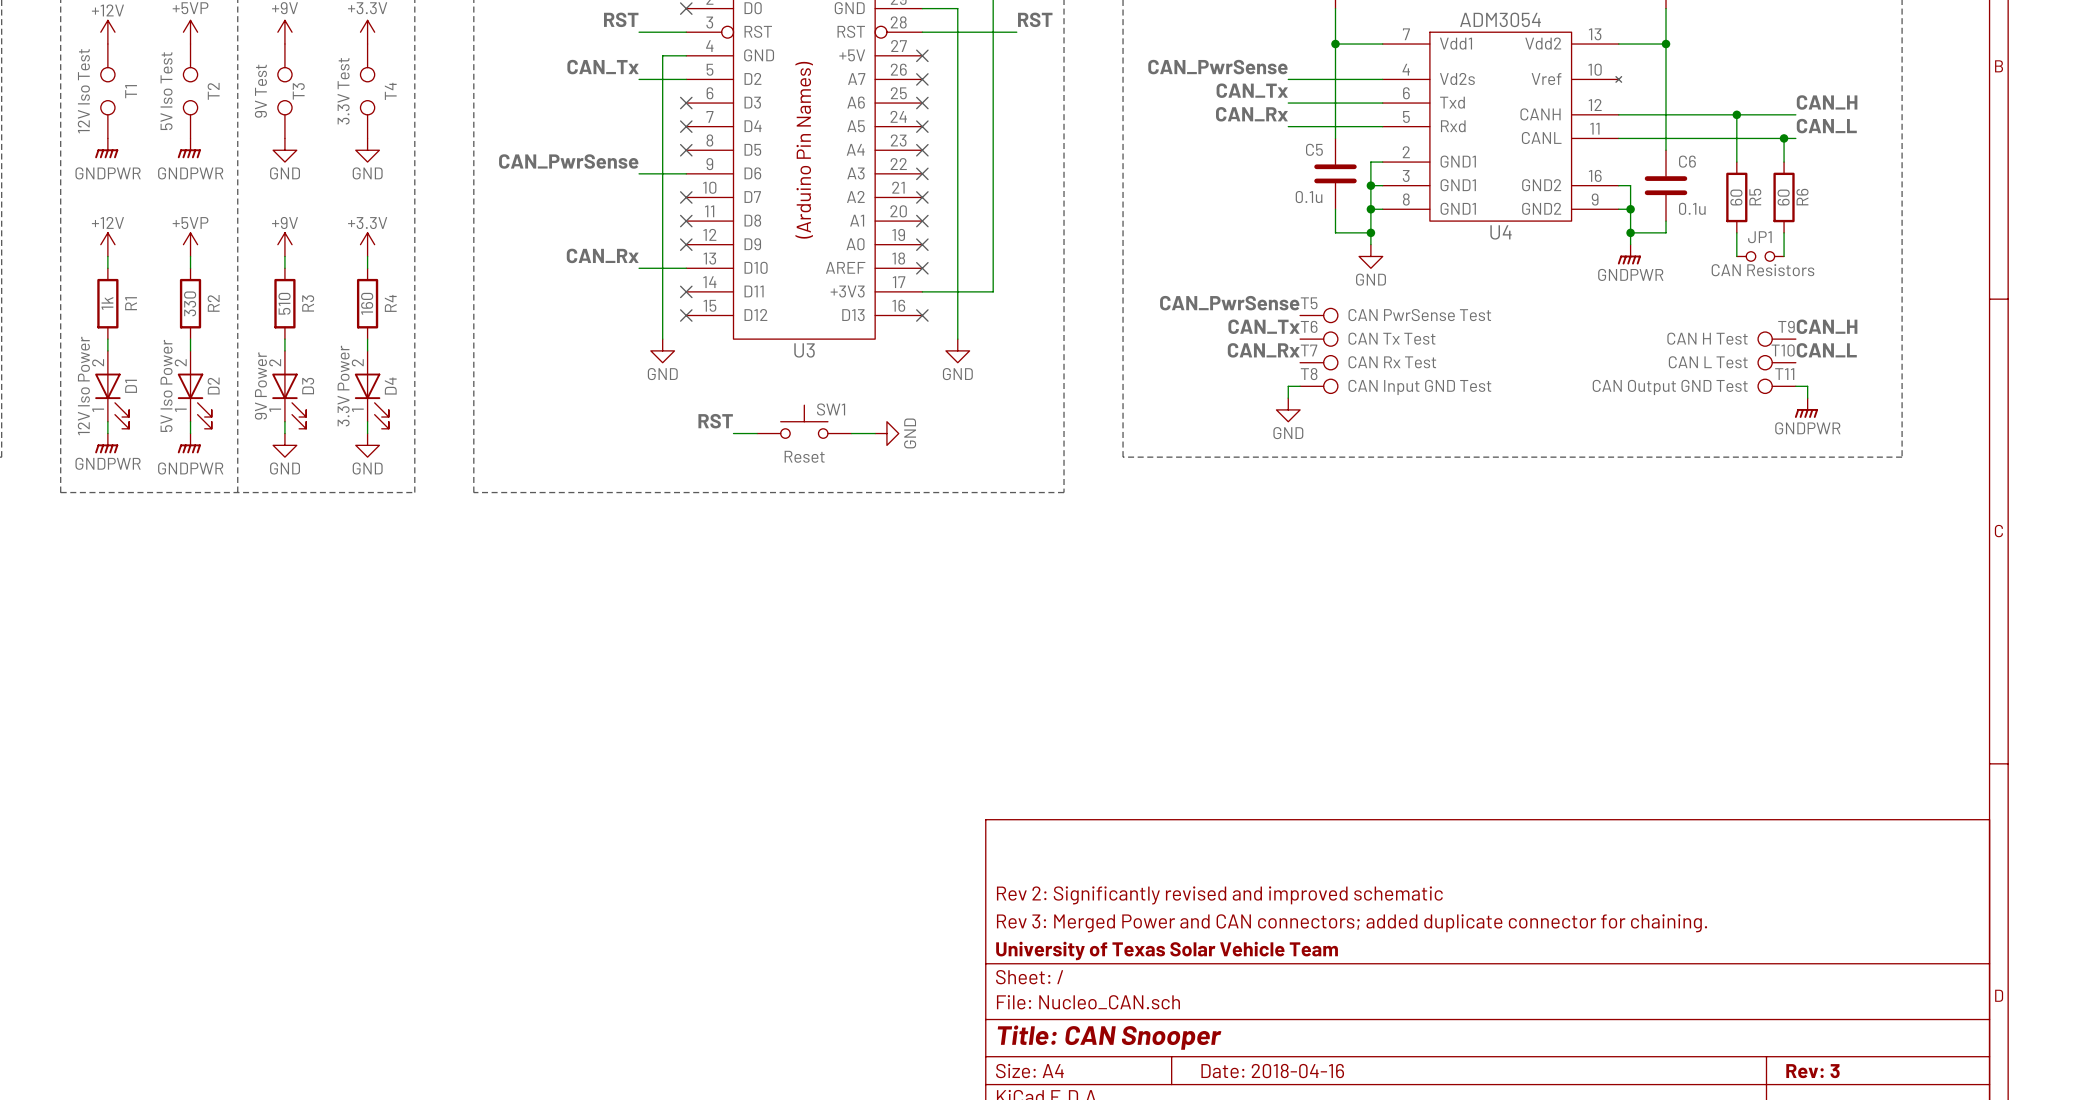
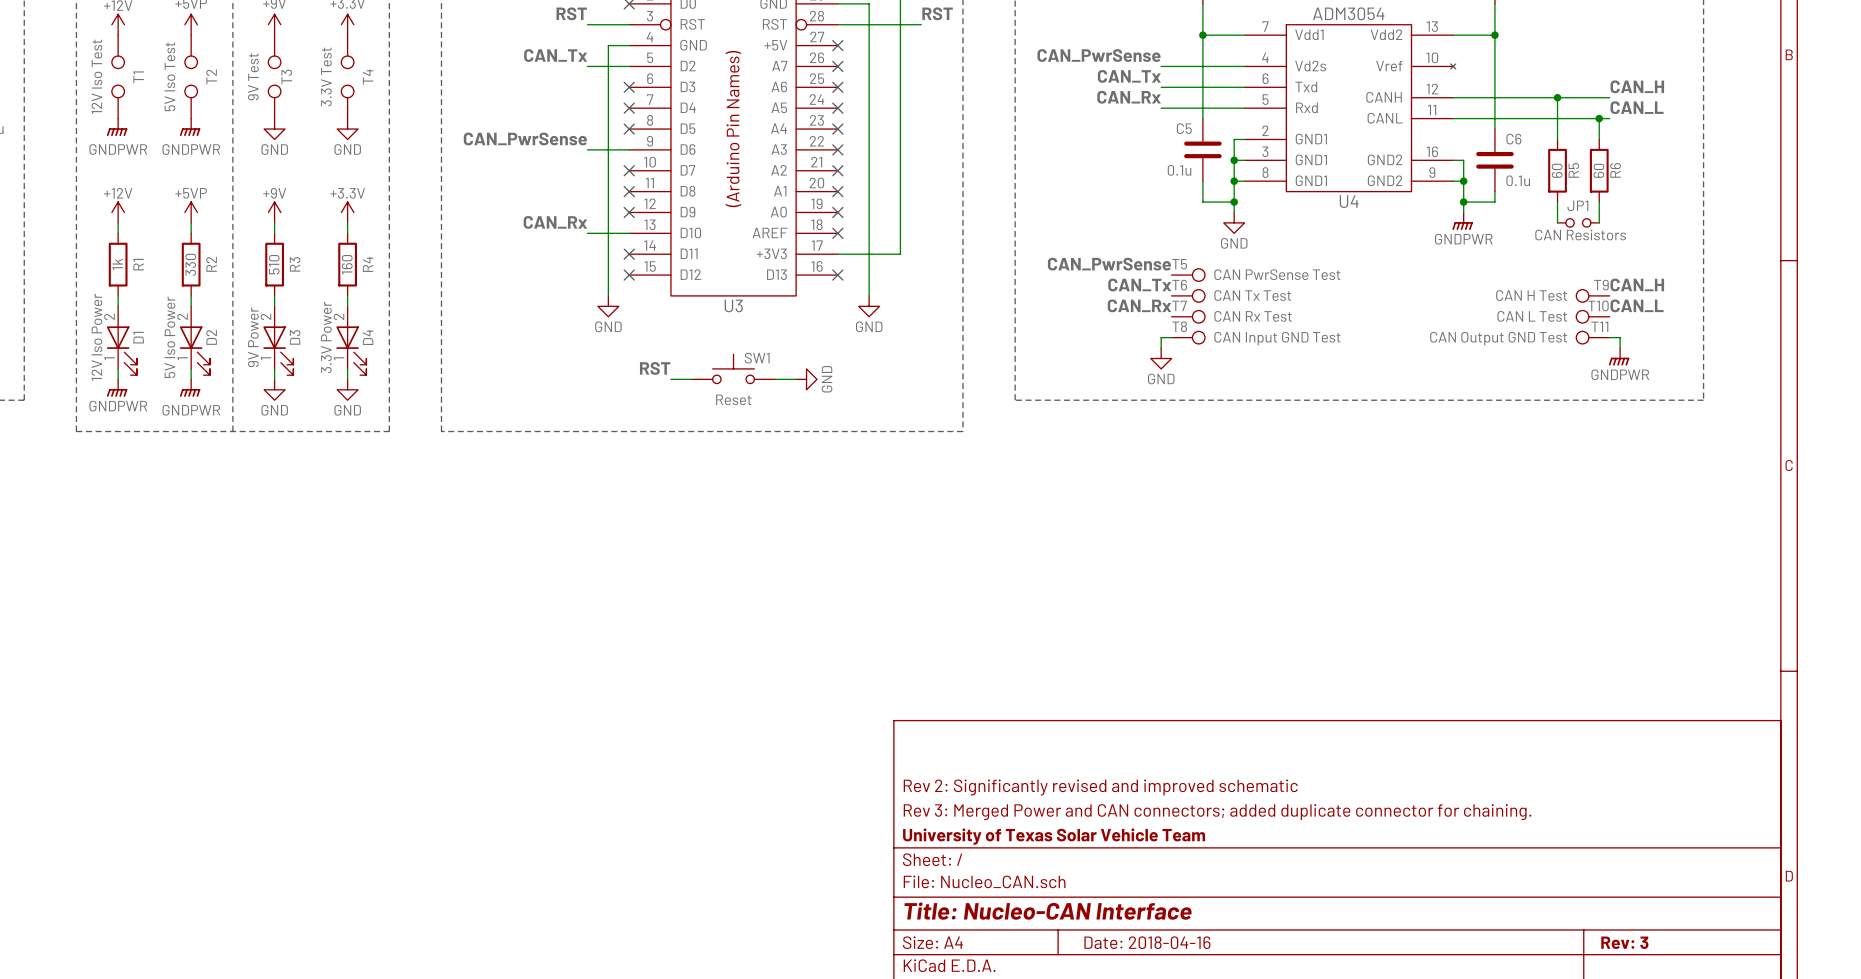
title block: Title: CAN Snooper (1109, 1037) -> Title: Nucleo-CAN Interface (1048, 911)

